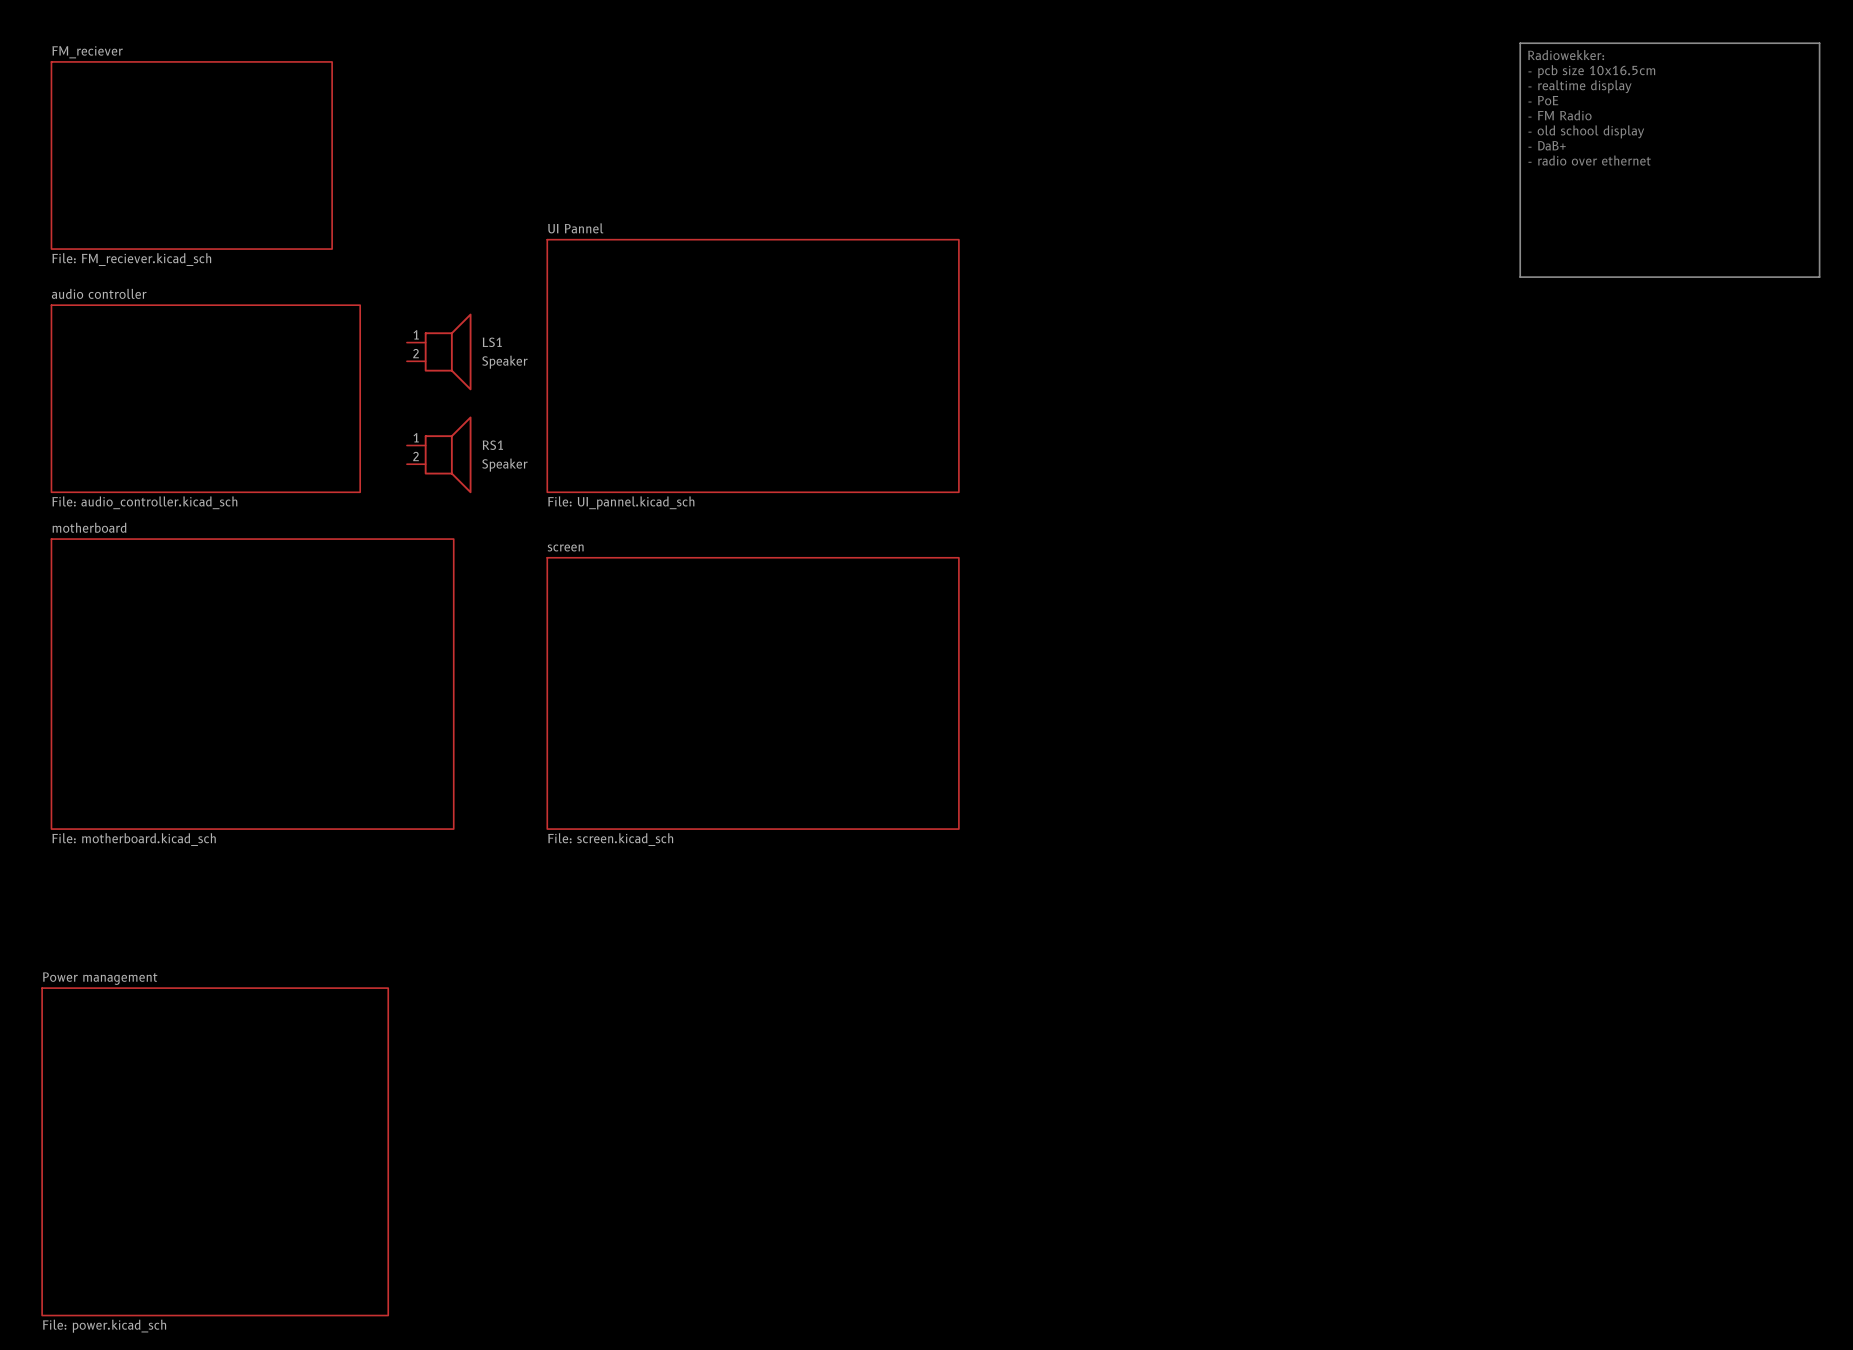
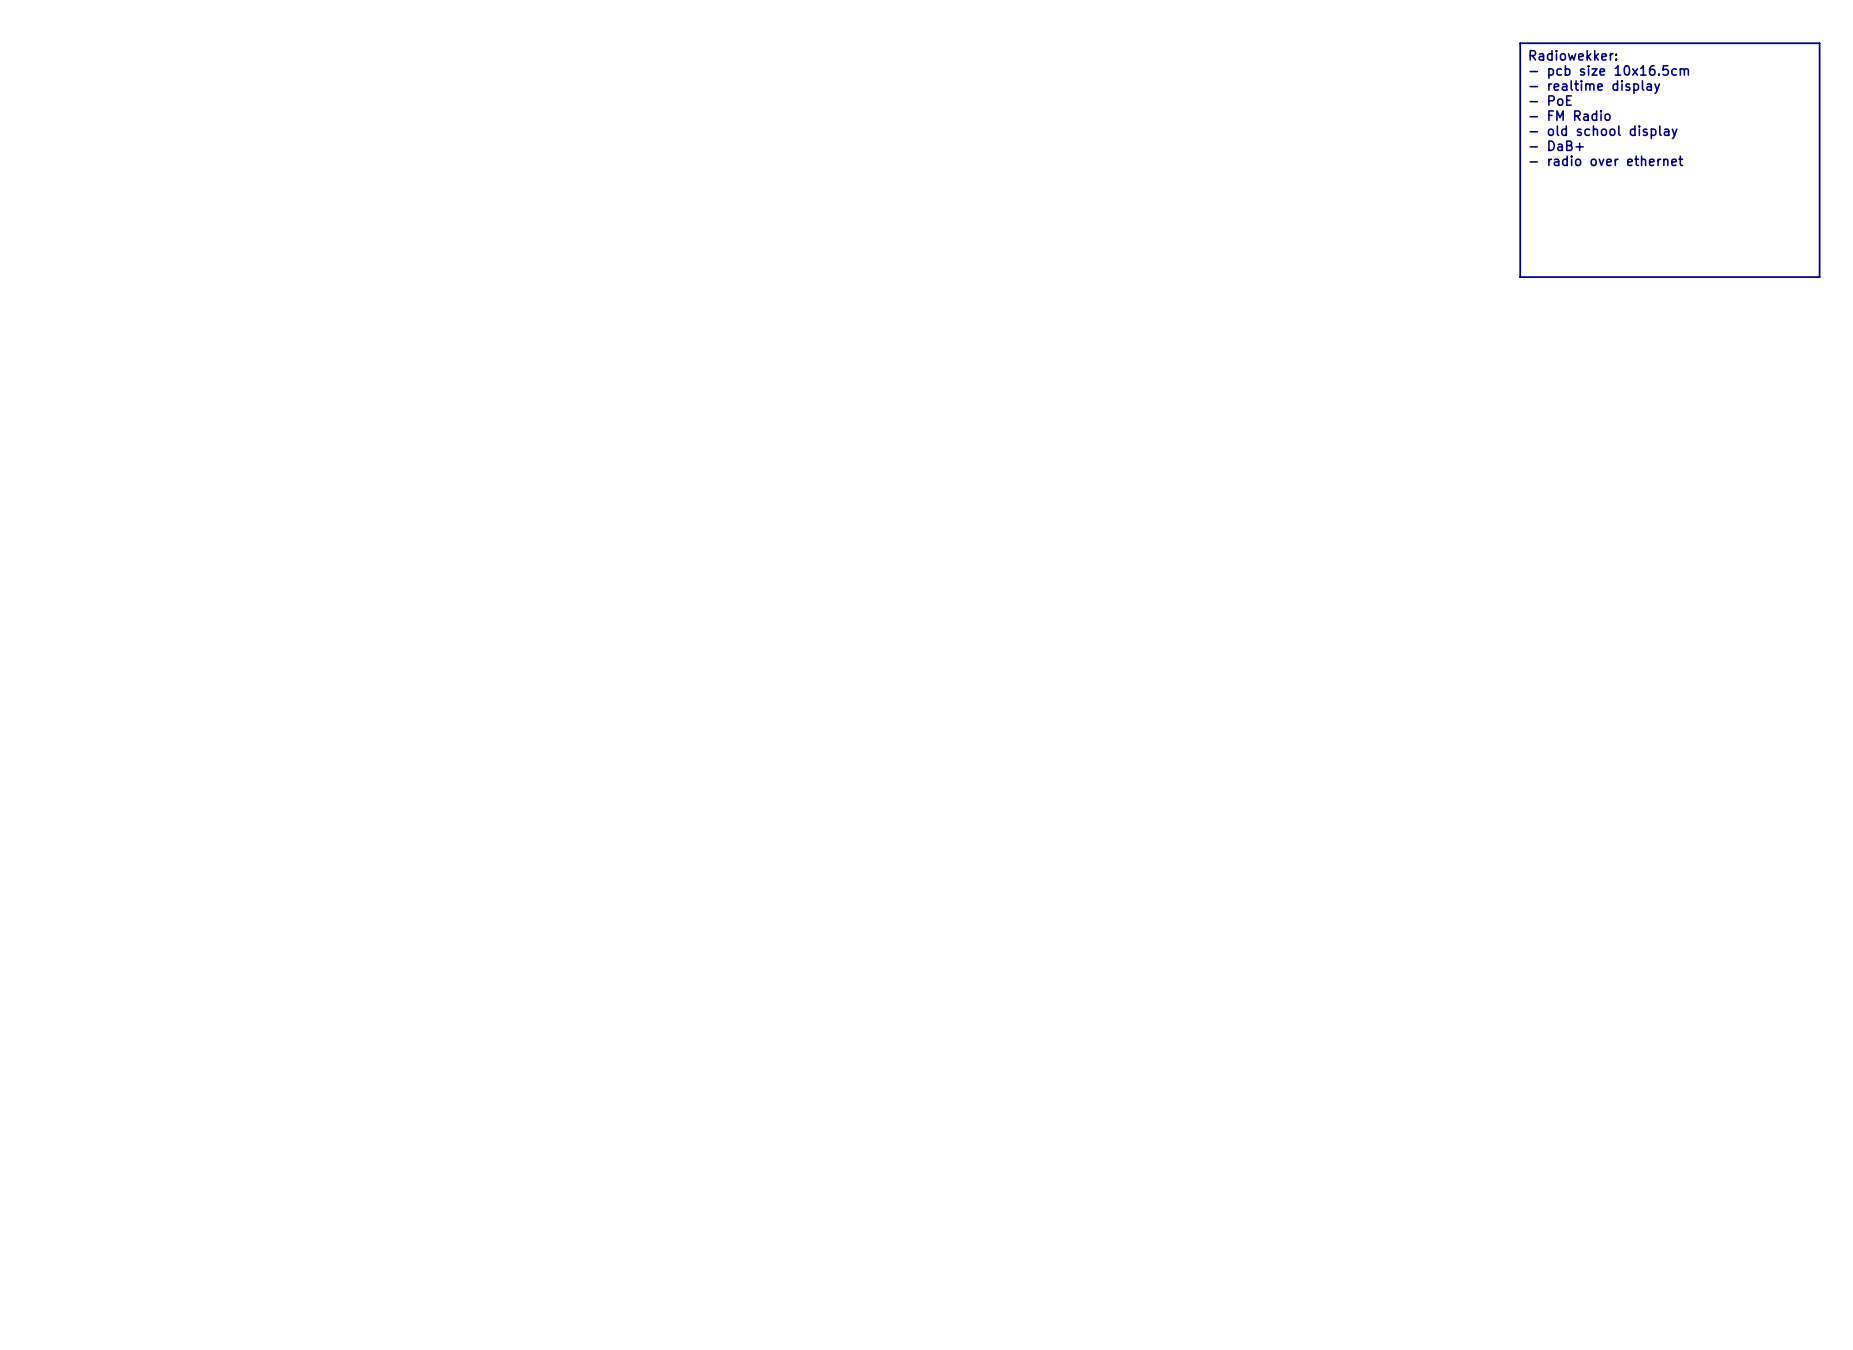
sheet FM_reciever: File: FM_reciever.kicad_sch (191, 155) -> none
LS1: Speaker (439, 351) -> none
sheet UI Pannel: File: UI_pannel.kicad_sch (753, 365) -> none
sheet audio controller: File: audio_controller.kicad_sch (205, 398) -> none
RS1: Speaker (439, 454) -> none
sheet motherboard: File: motherboard.kicad_sch (252, 684) -> none
sheet screen: File: screen.kicad_sch (753, 693) -> none
sheet Power management: File: power.kicad_sch (215, 1151) -> none

